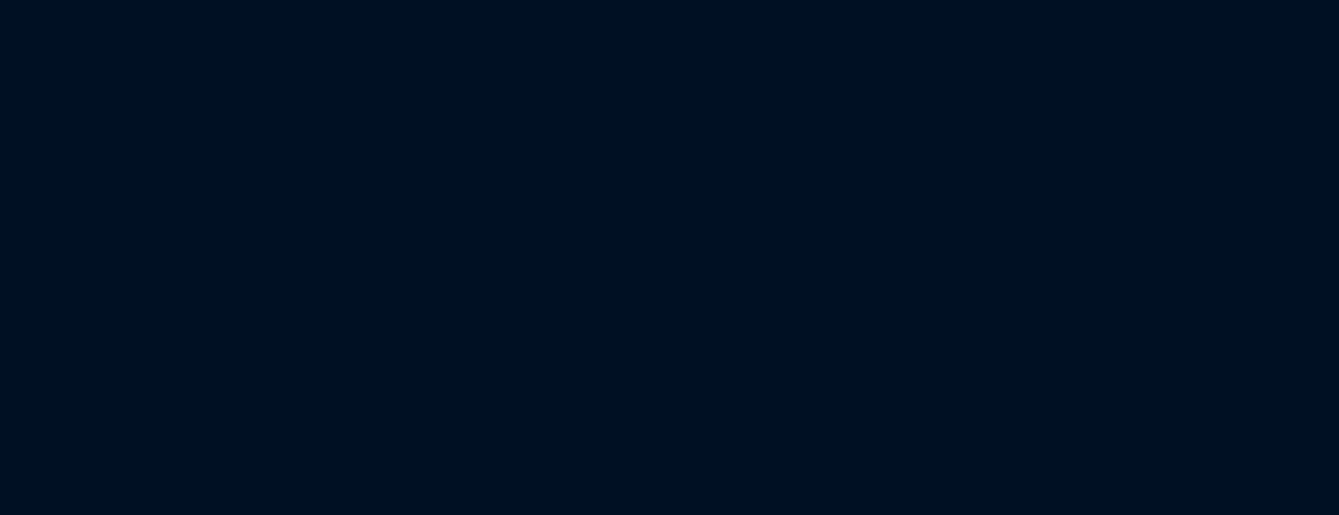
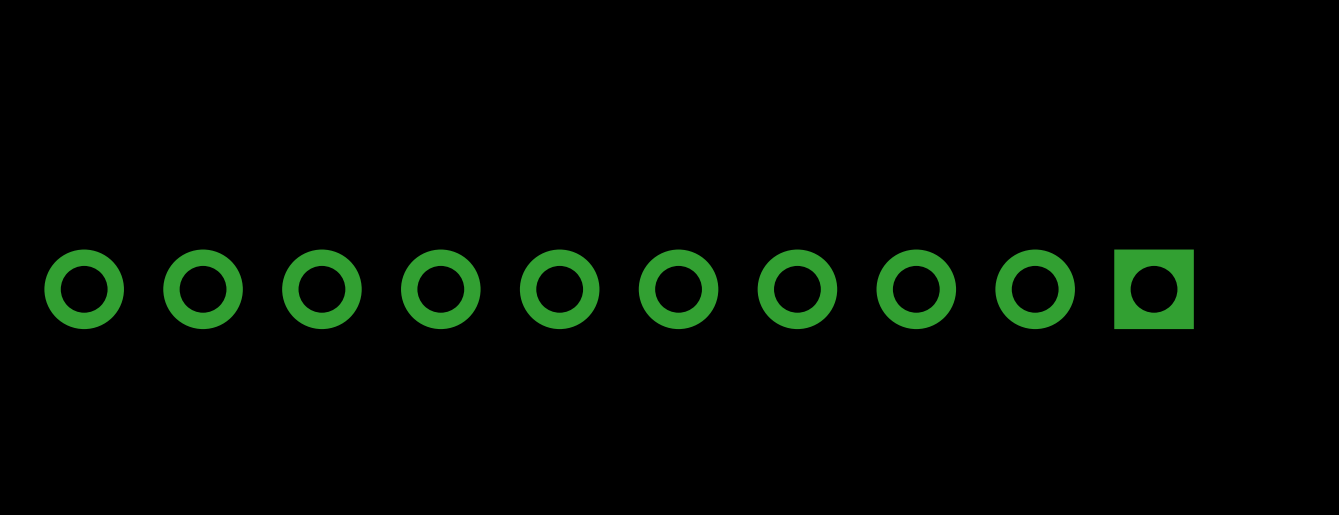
part: none -> (619, 289)

